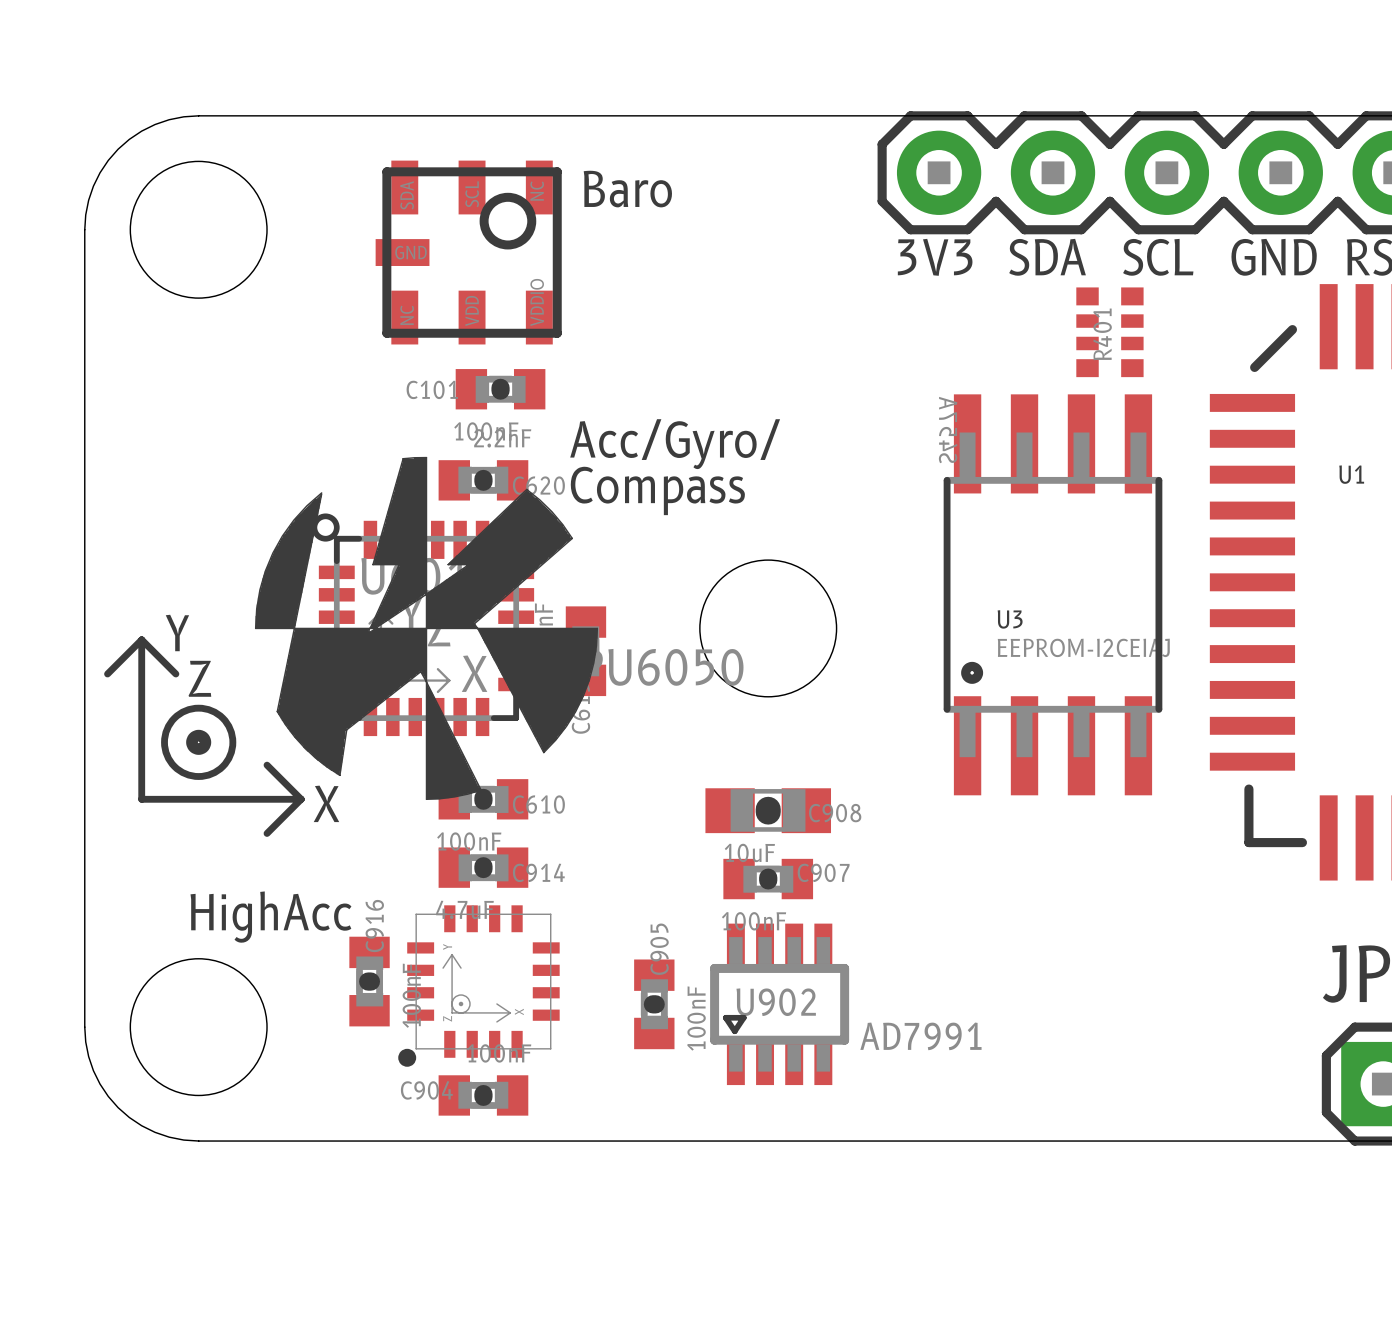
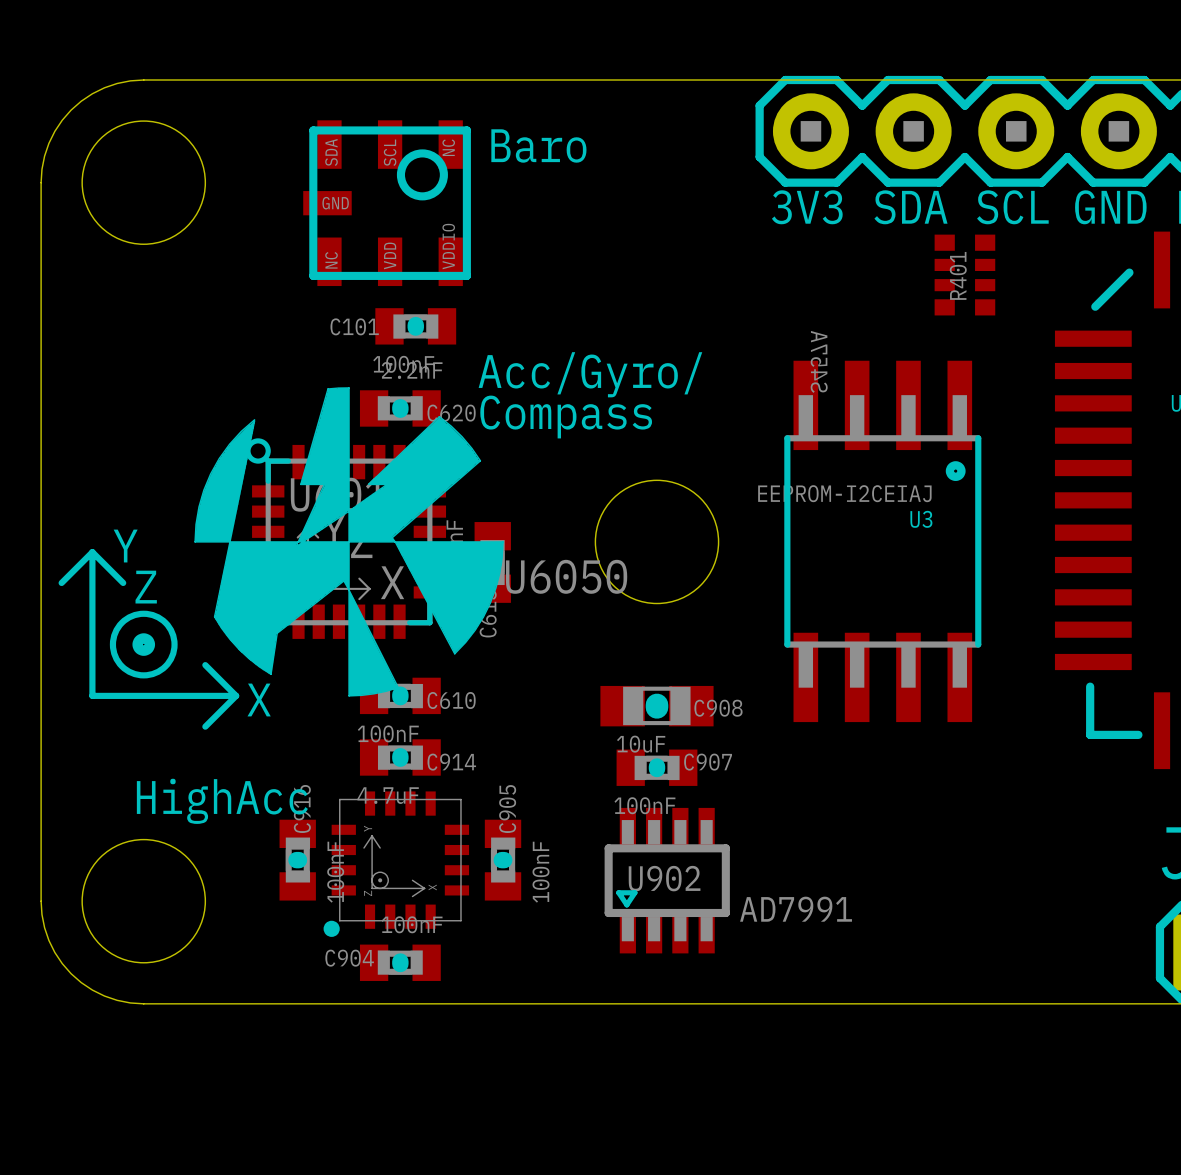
U3 rotation: 0° (1052, 594) -> 180° (882, 541)
C905 position: (654, 1004) -> (503, 860)

